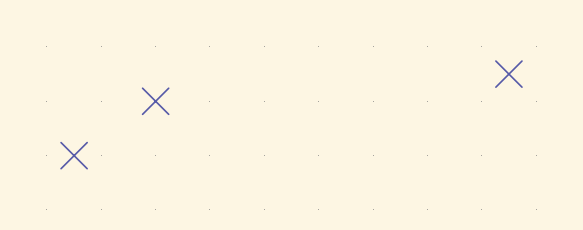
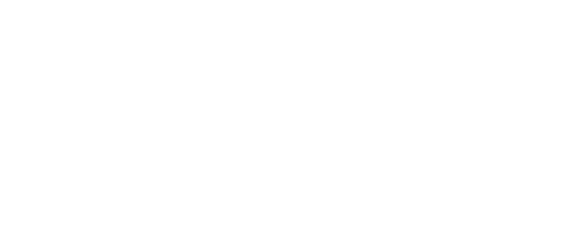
no-connect mark: (508, 74) -> none
no-connect mark: (155, 101) -> none
no-connect mark: (74, 155) -> none

